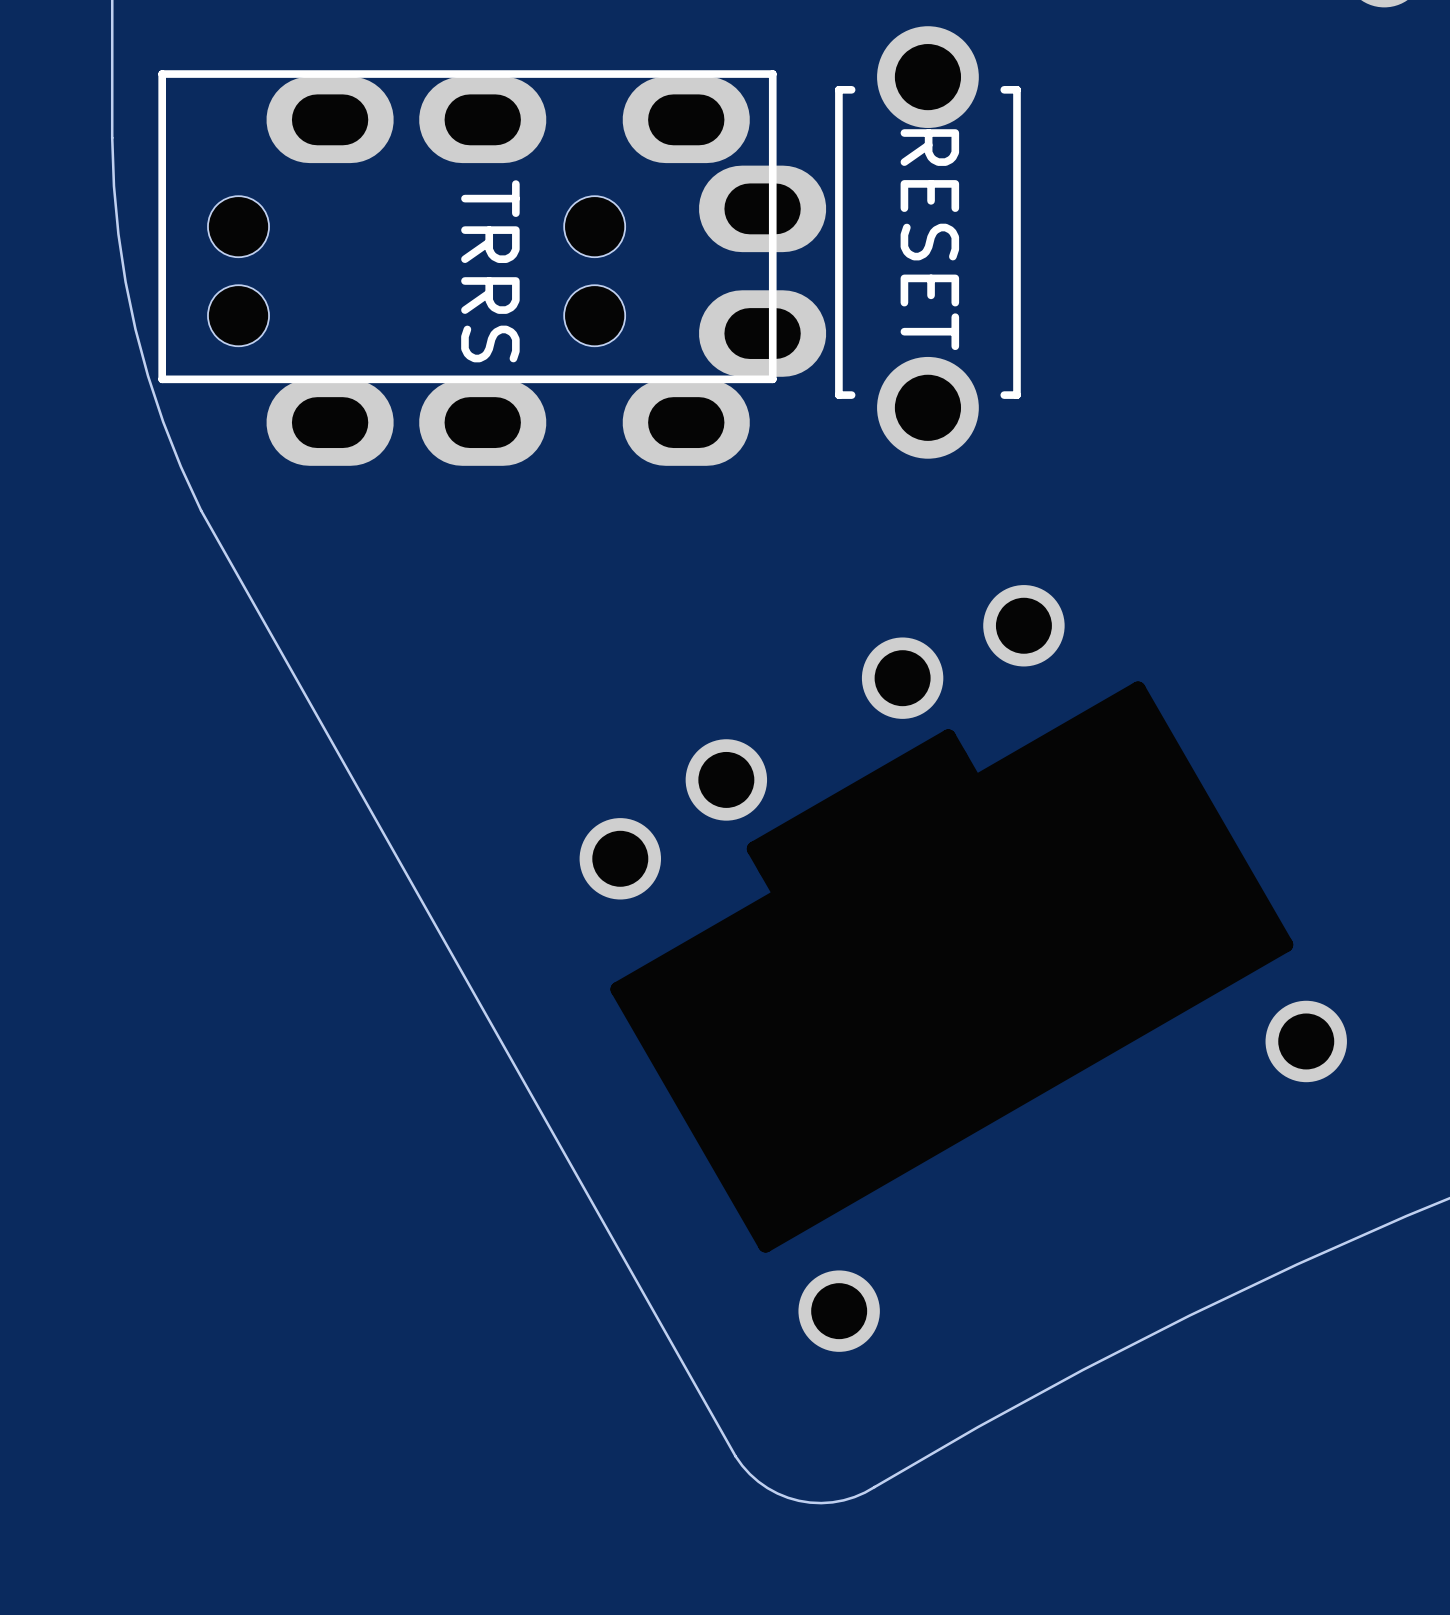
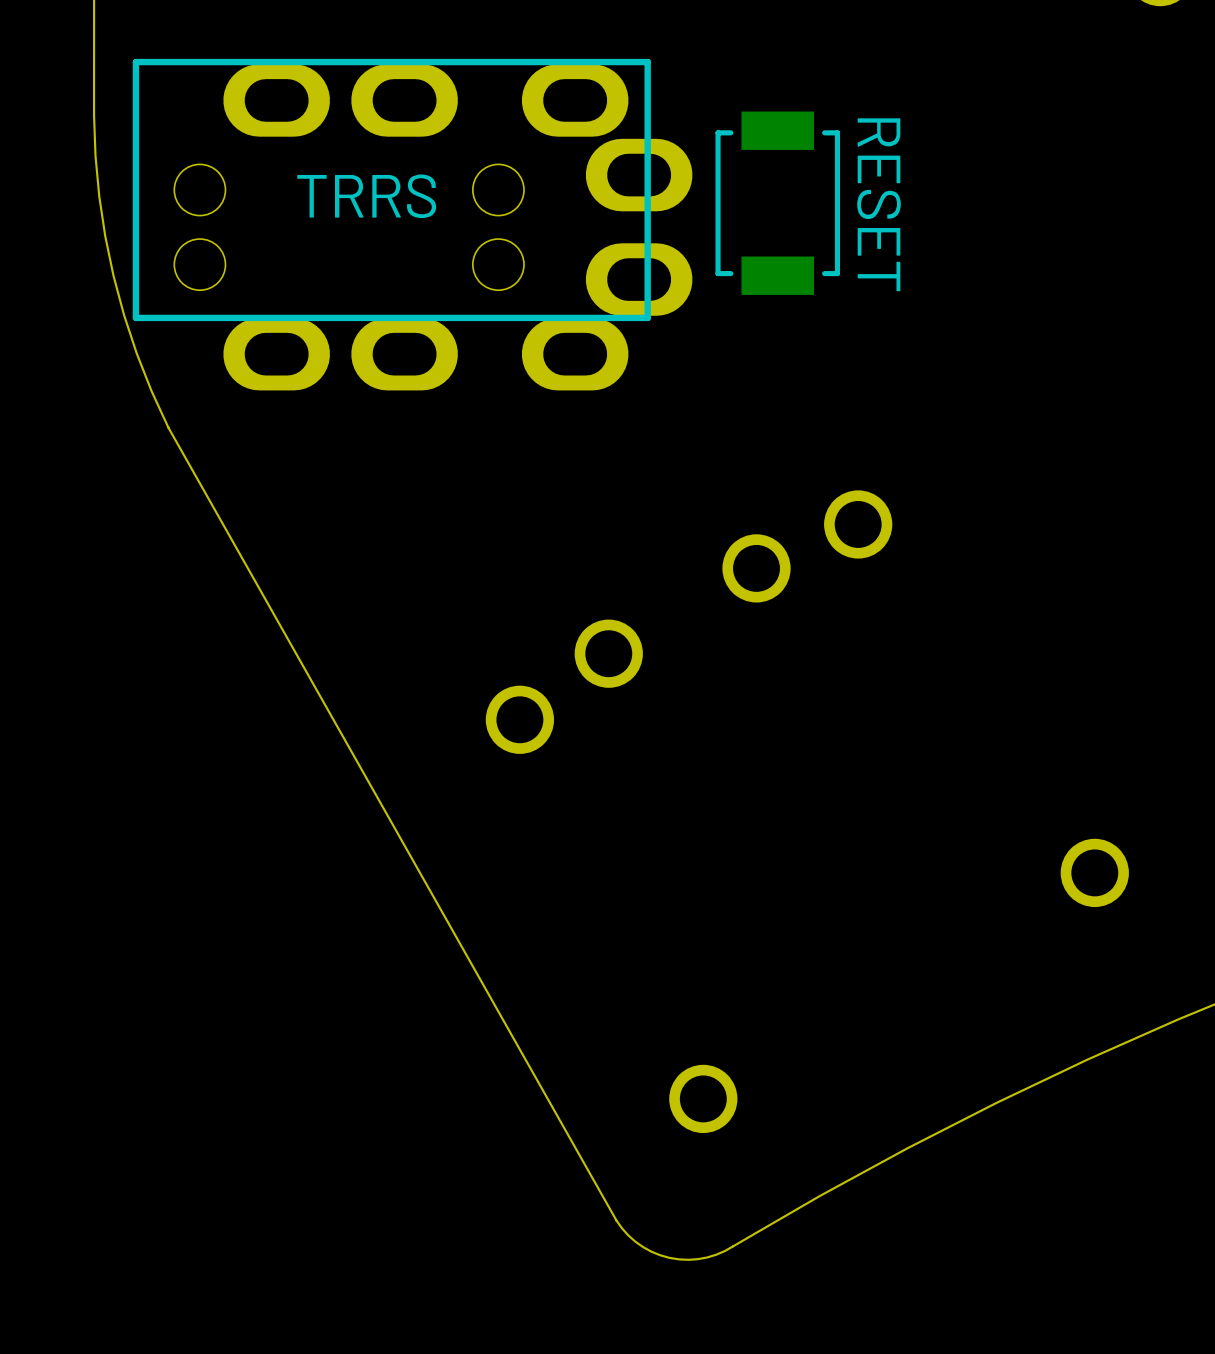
part footprint: [835, 26, 1021, 459] -> [715, 111, 841, 295]
part text rotation: 0° (490, 271) -> 90° counterclockwise (366, 196)

